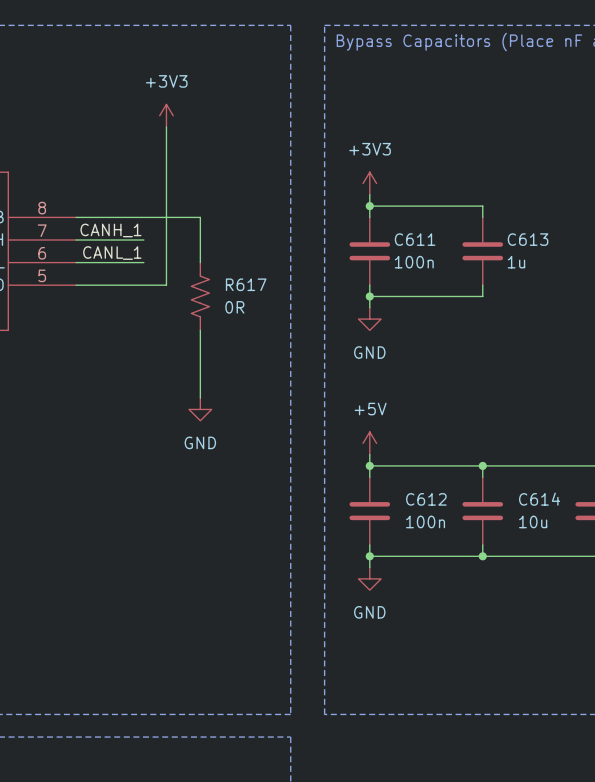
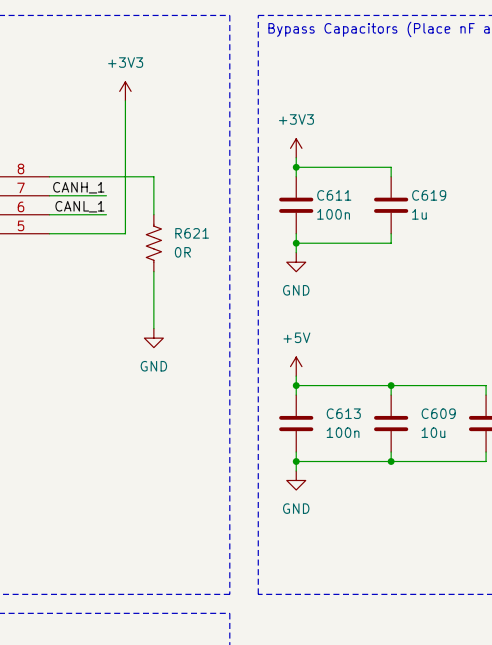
C613 name: C613 (528, 239) -> C619 (429, 195)
R617 name: R617 (246, 284) -> R621 (192, 233)
C612 name: C612 (426, 499) -> C613 (343, 413)
C614 name: C614 (539, 499) -> C609 (438, 413)

